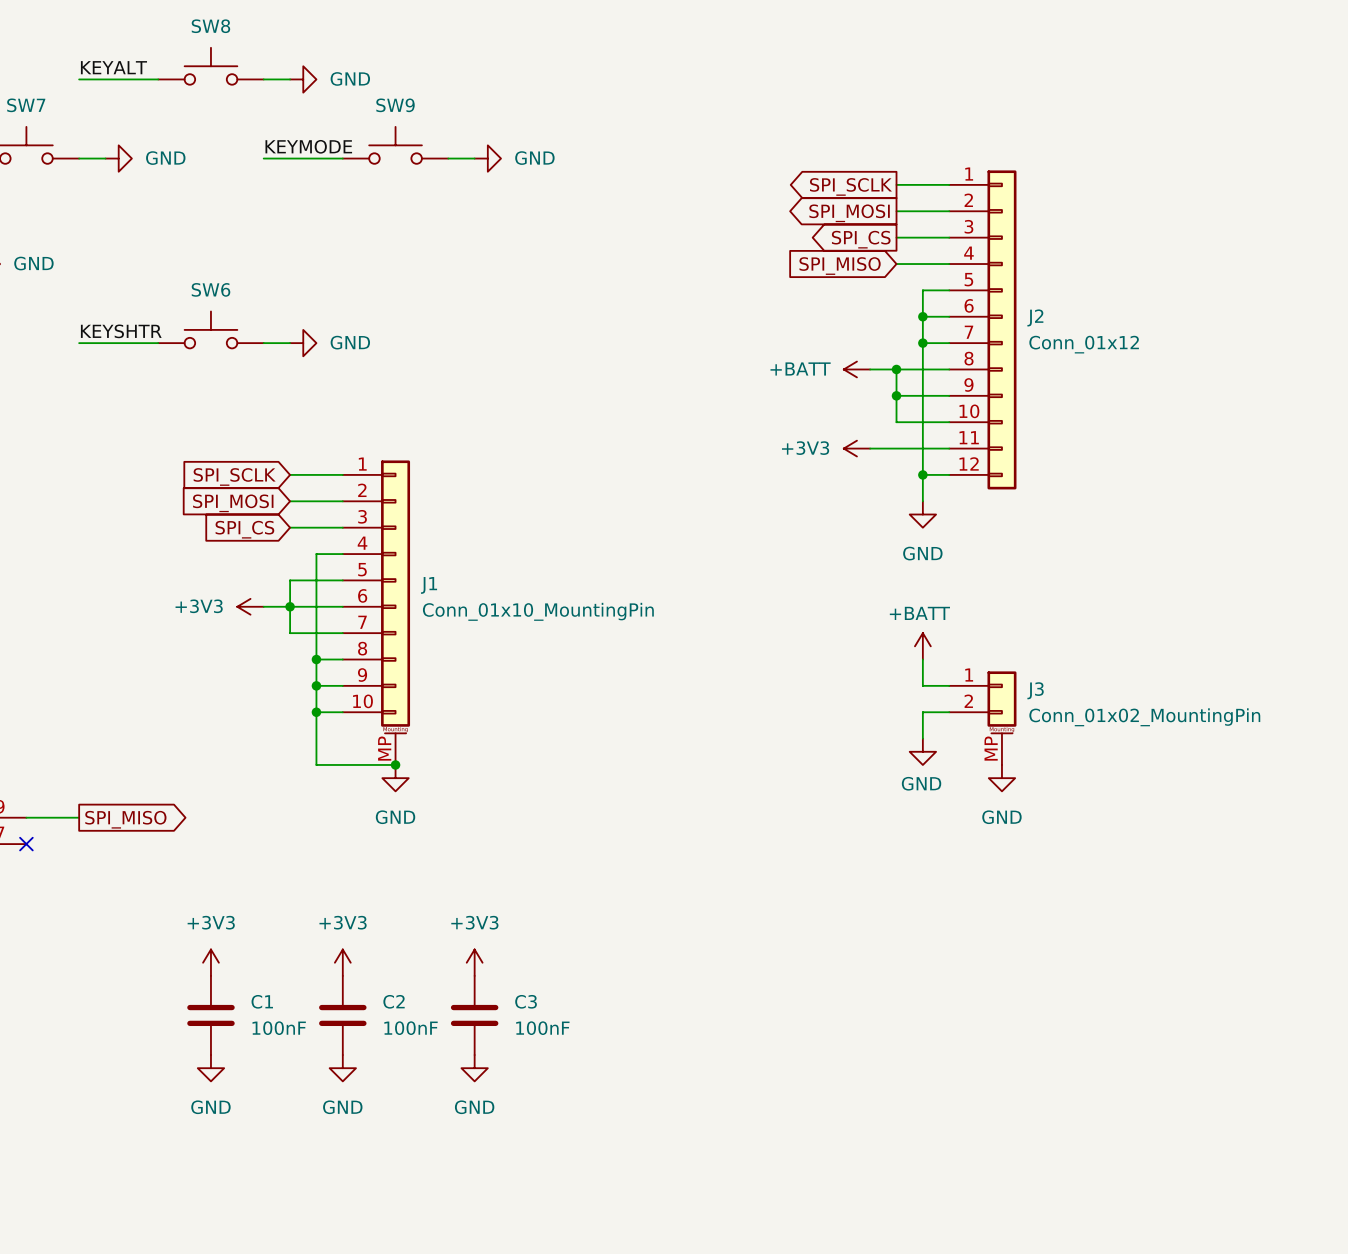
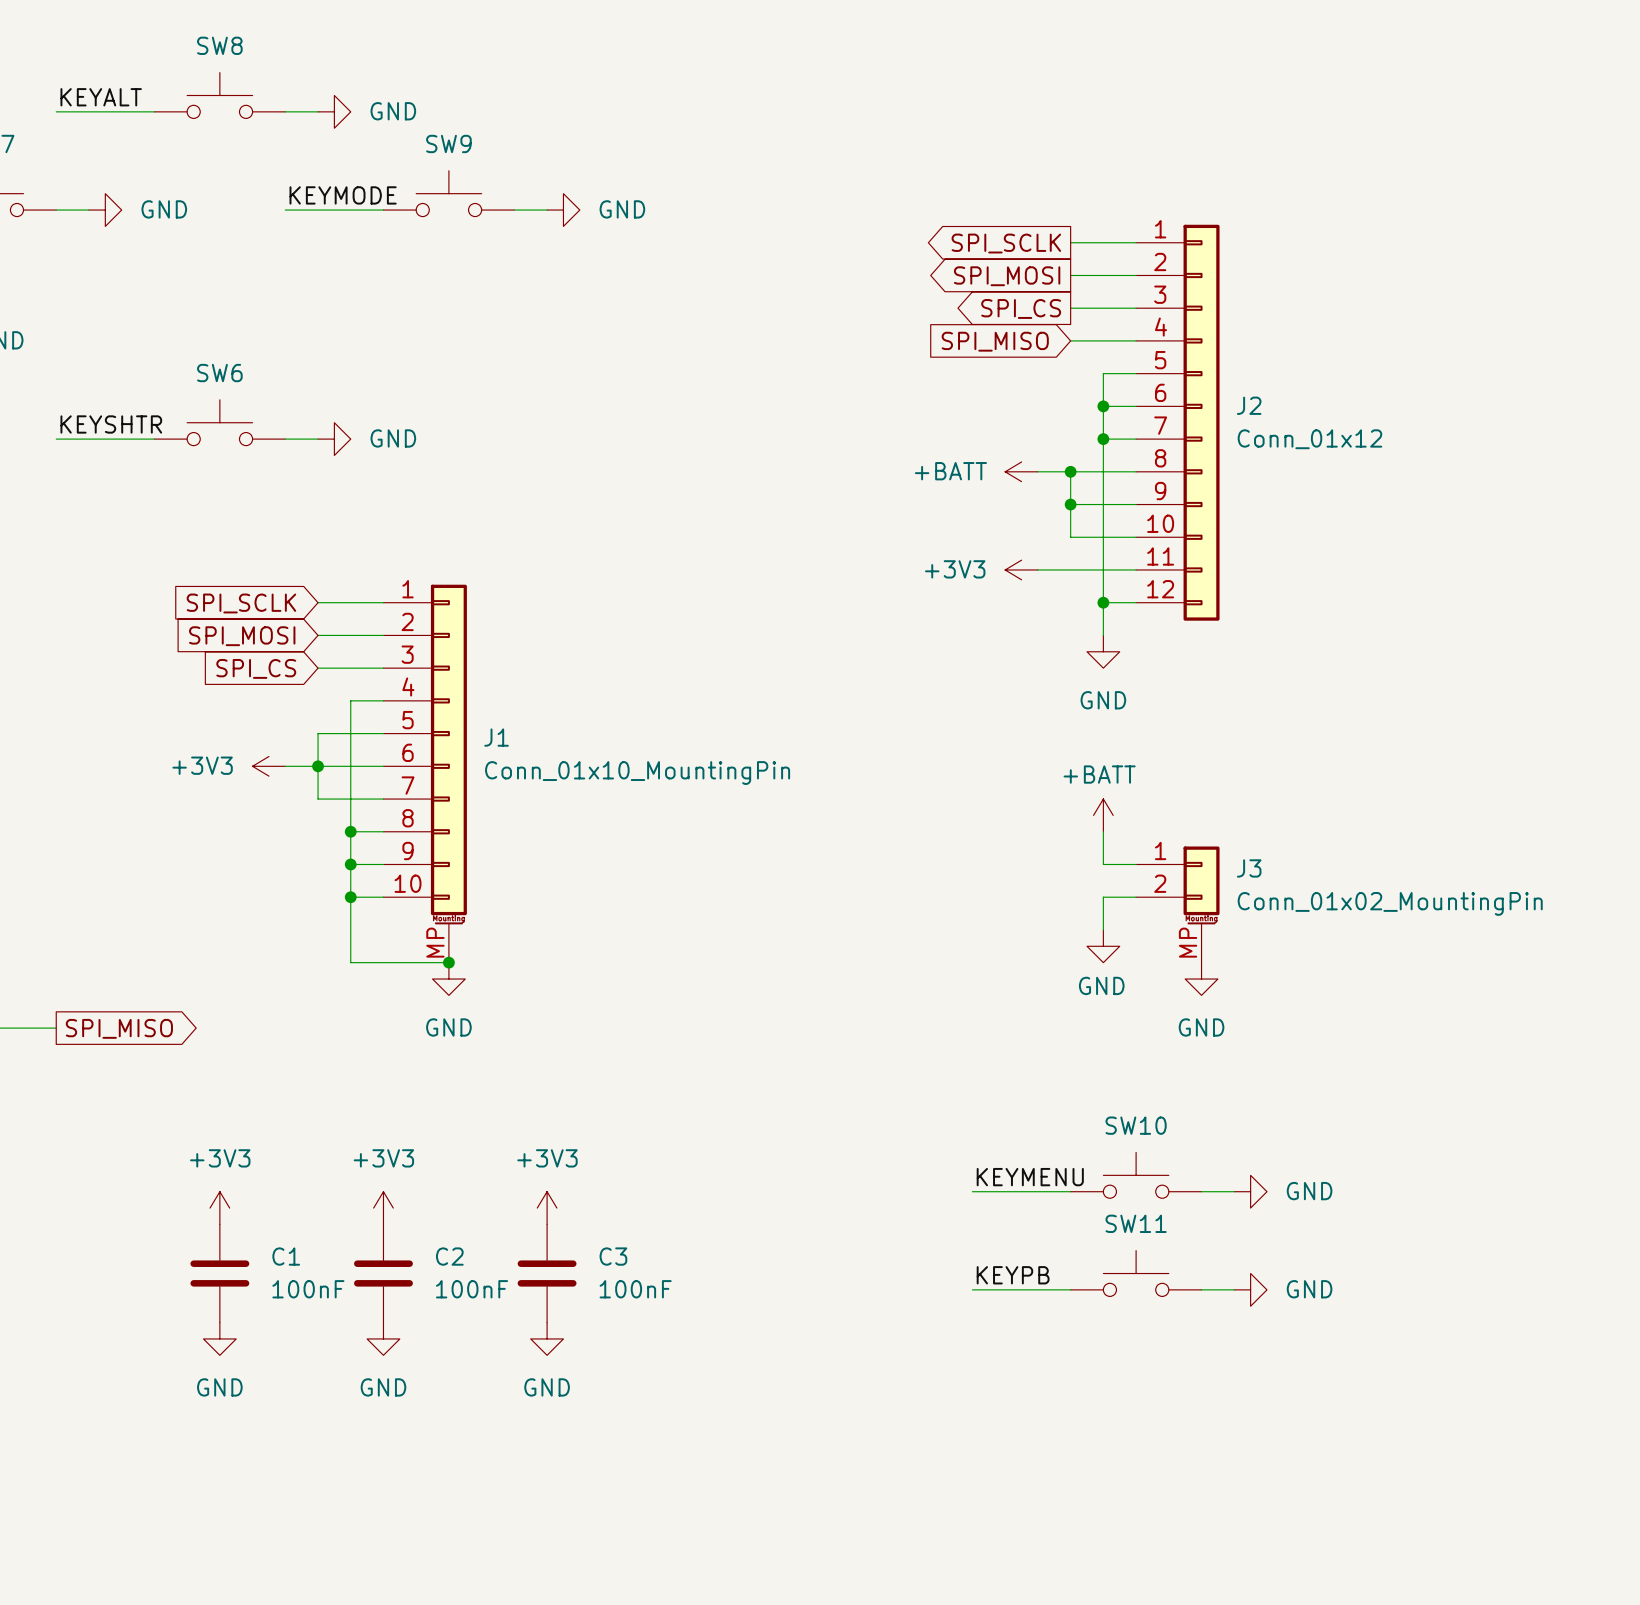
SW10: none -> (1136, 1175)
label: none -> KEYMENU (1030, 1177)
wire: none -> (972, 1191) (1070, 1191)
wire: none -> (1201, 1191) (1234, 1191)
power symbol: none -> GND (1250, 1191)
SW11: none -> (1136, 1273)
label: none -> KEYPB (1013, 1275)
wire: none -> (972, 1289) (1070, 1289)
wire: none -> (1201, 1289) (1234, 1289)
power symbol: none -> GND (1250, 1289)

